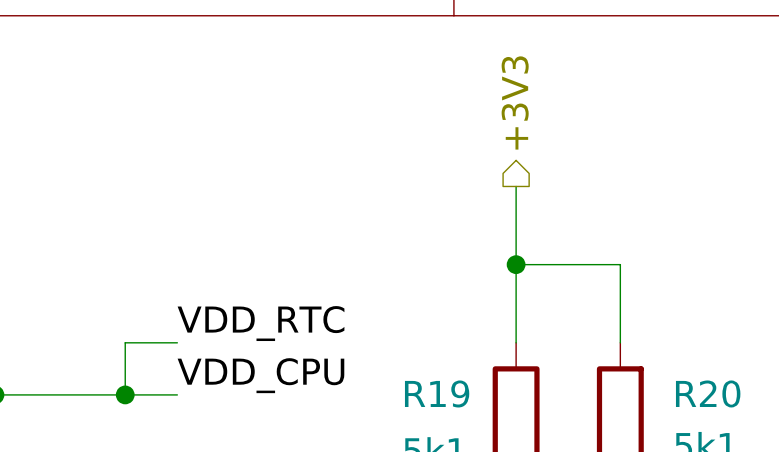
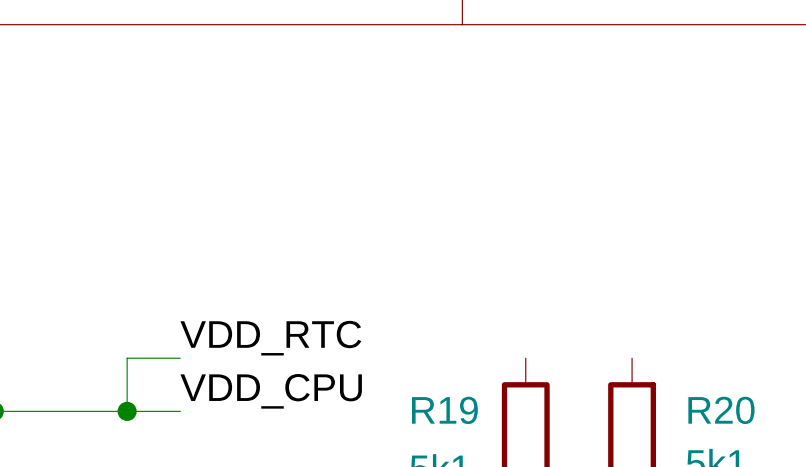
hierarchical label: +3V3 (515, 102) -> none
wire: (516, 186) (516, 342) -> none
wire: (516, 264) (620, 264) (620, 342) -> none
junction: (516, 264) -> none

